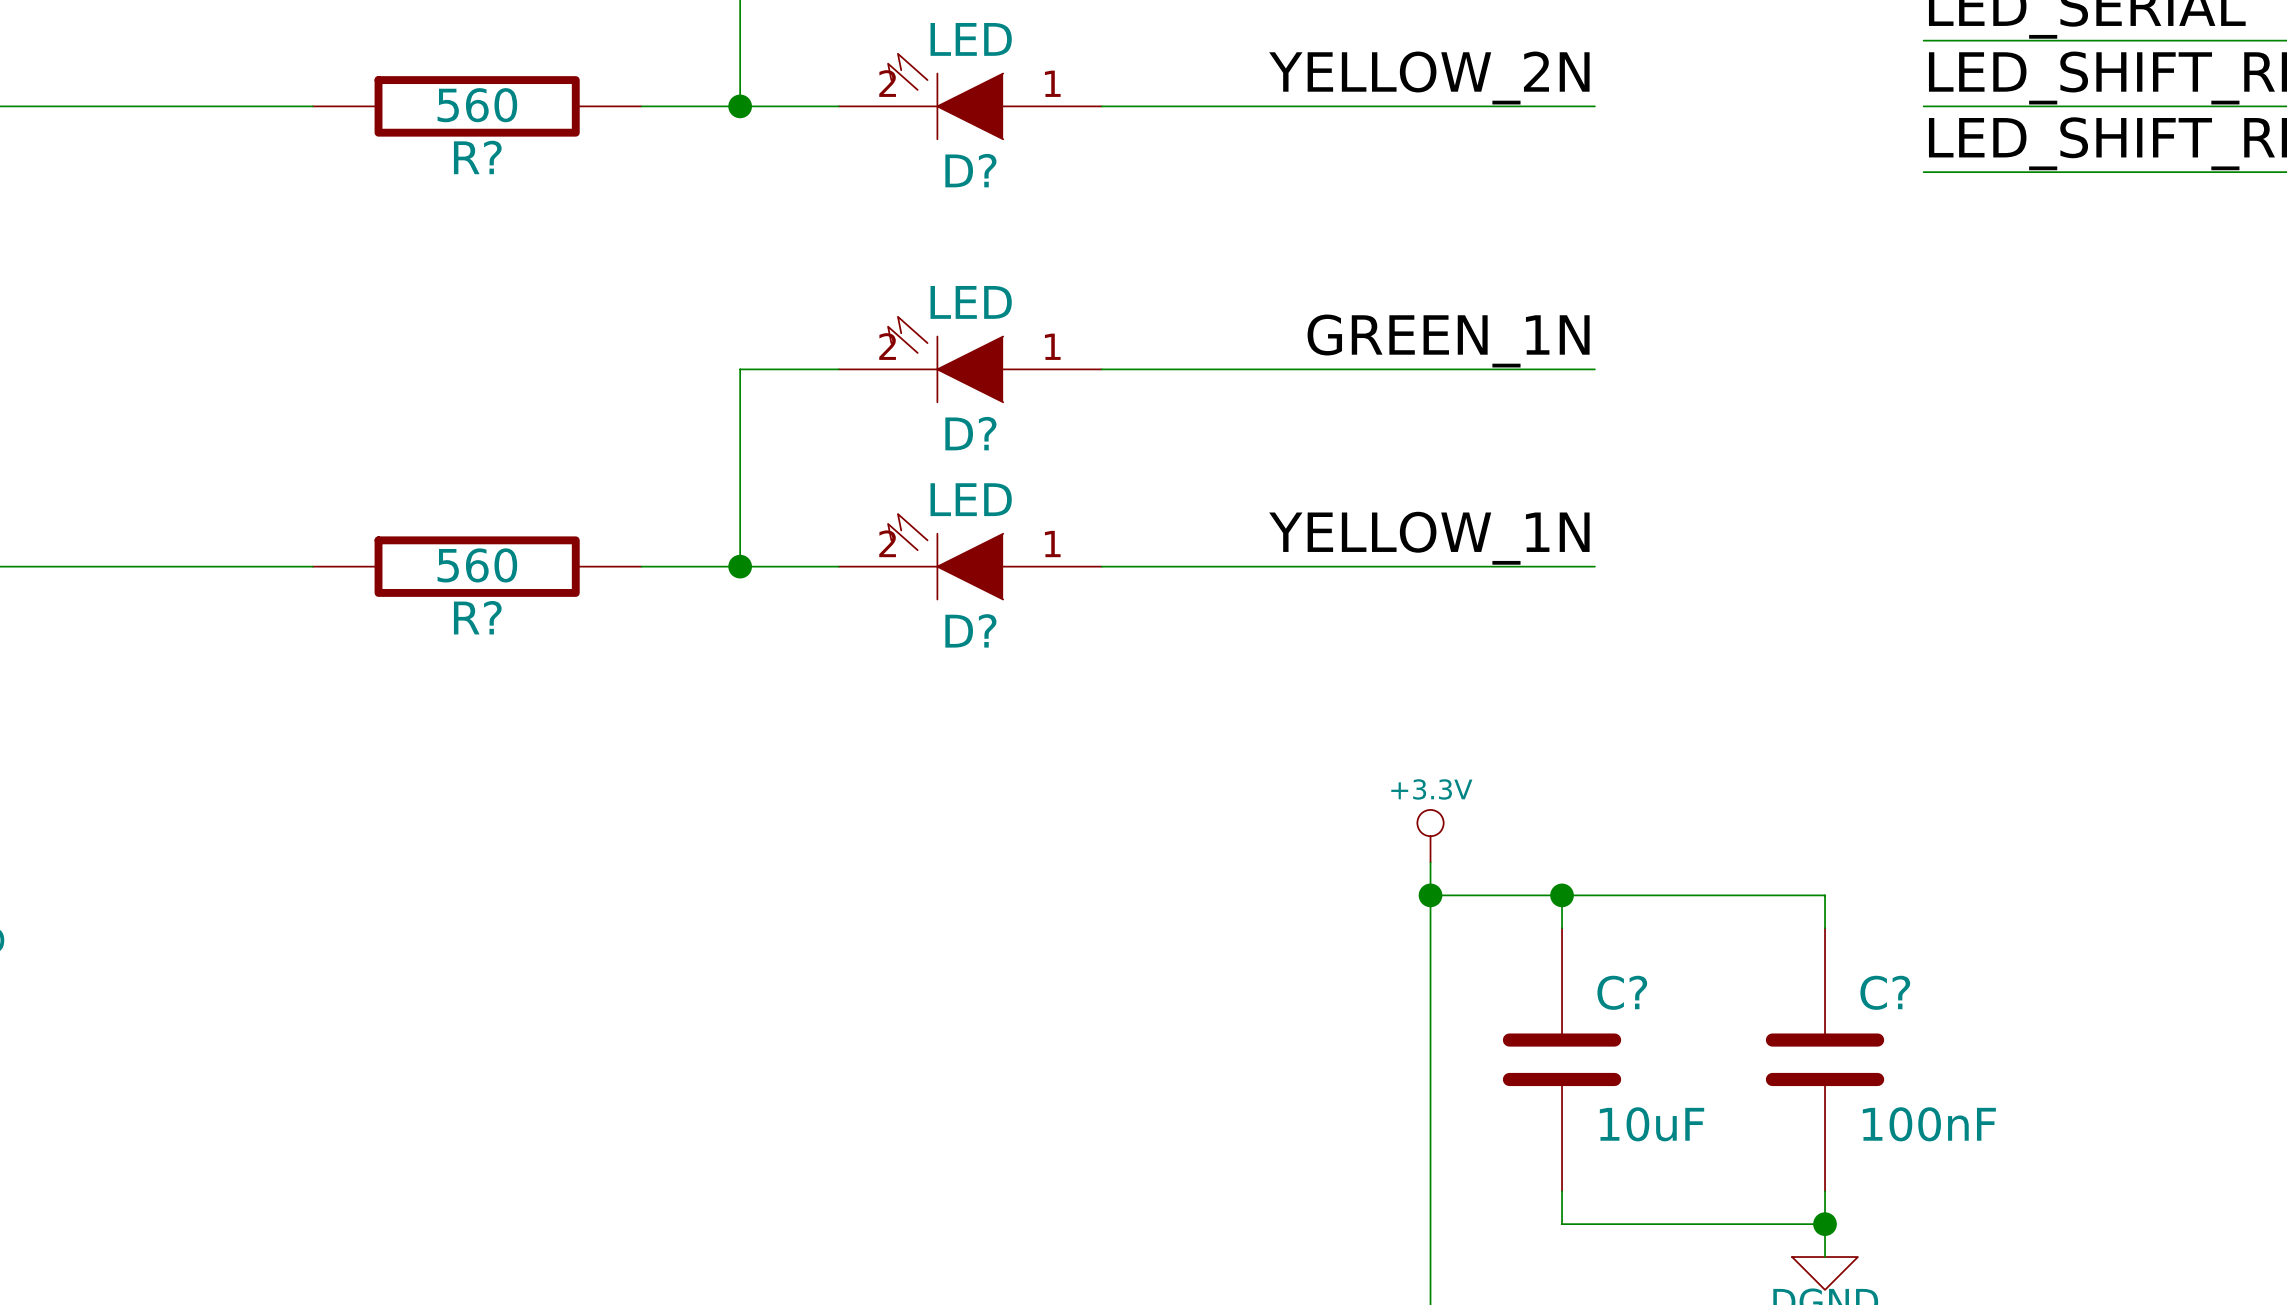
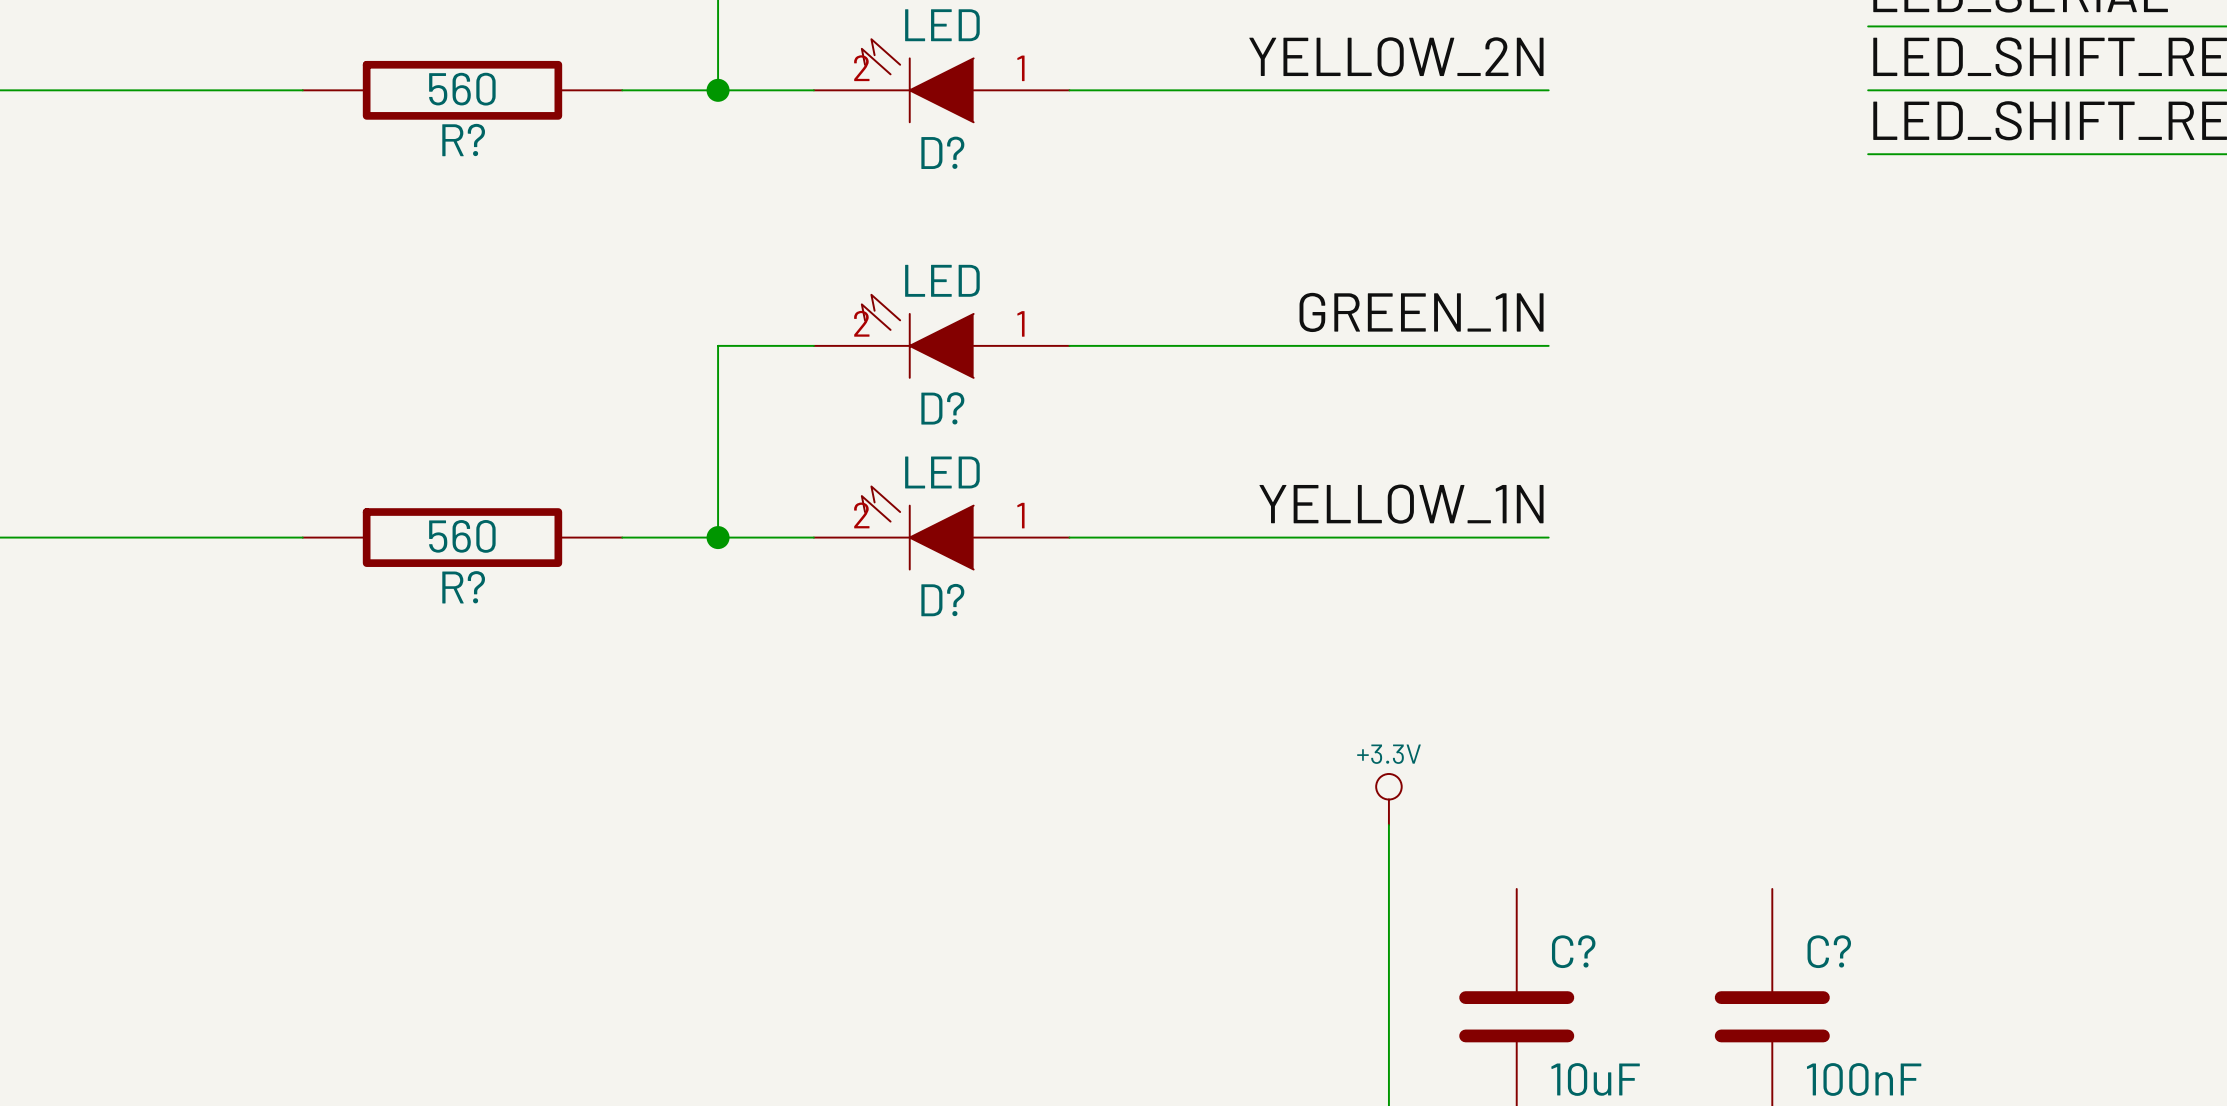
wire: (1430, 895) (1825, 895) (1825, 928) -> none
junction: (1430, 895) -> none
wire: (1562, 895) (1562, 928) -> none
junction: (1562, 895) -> none

